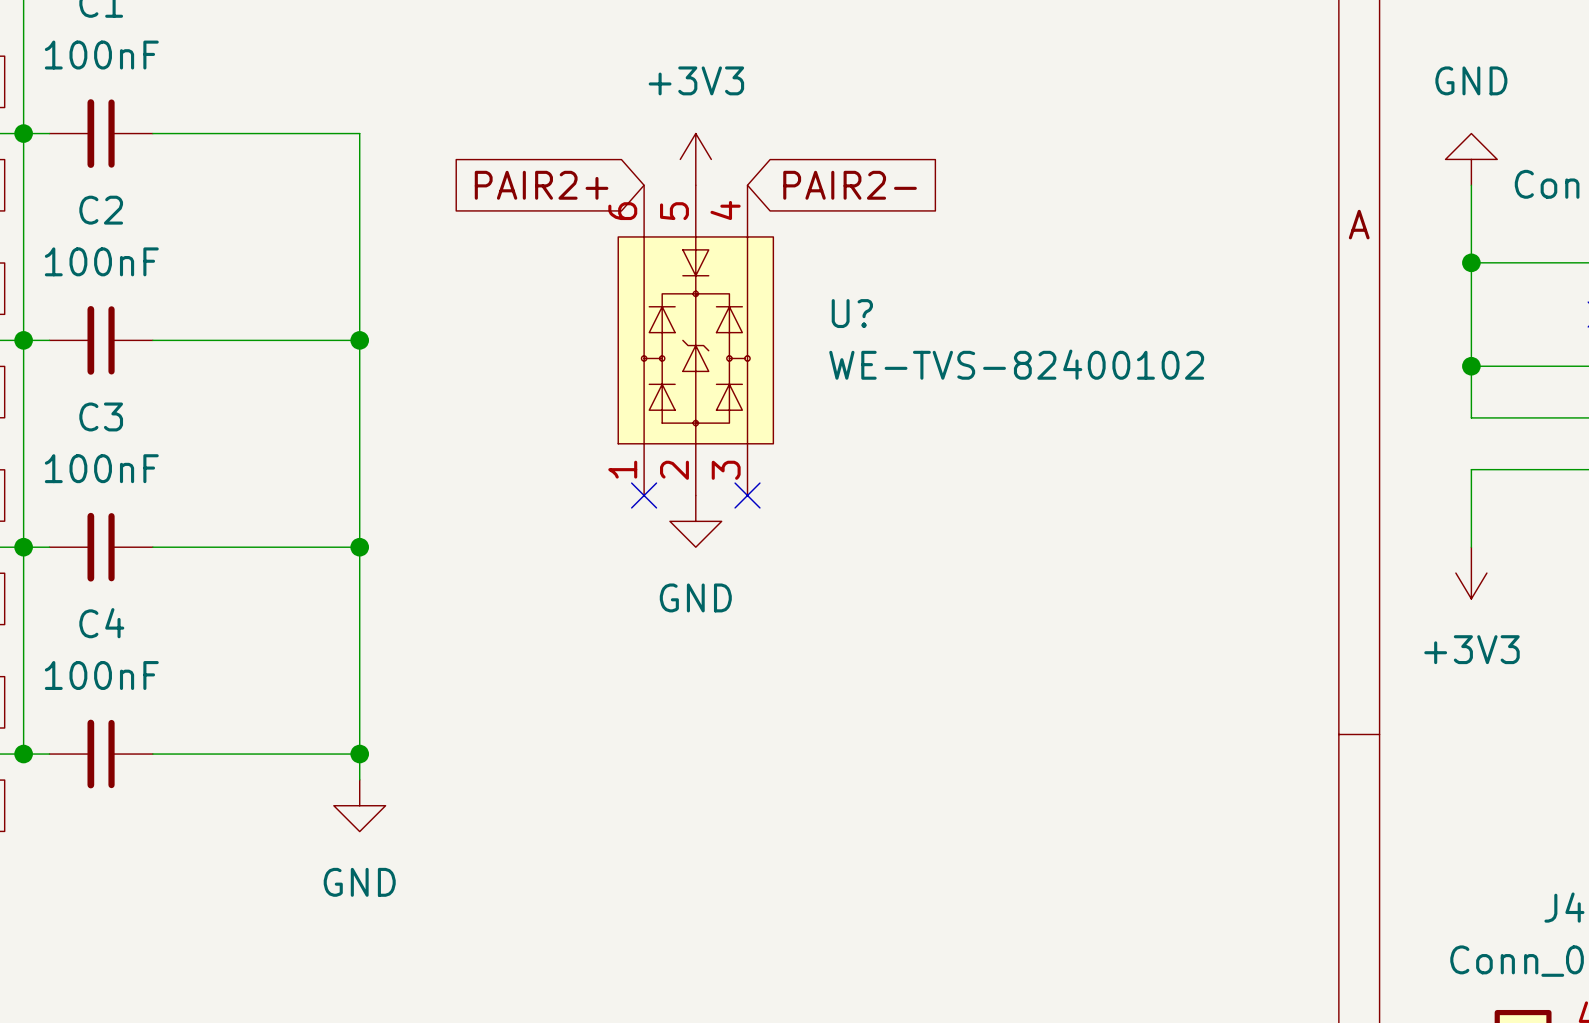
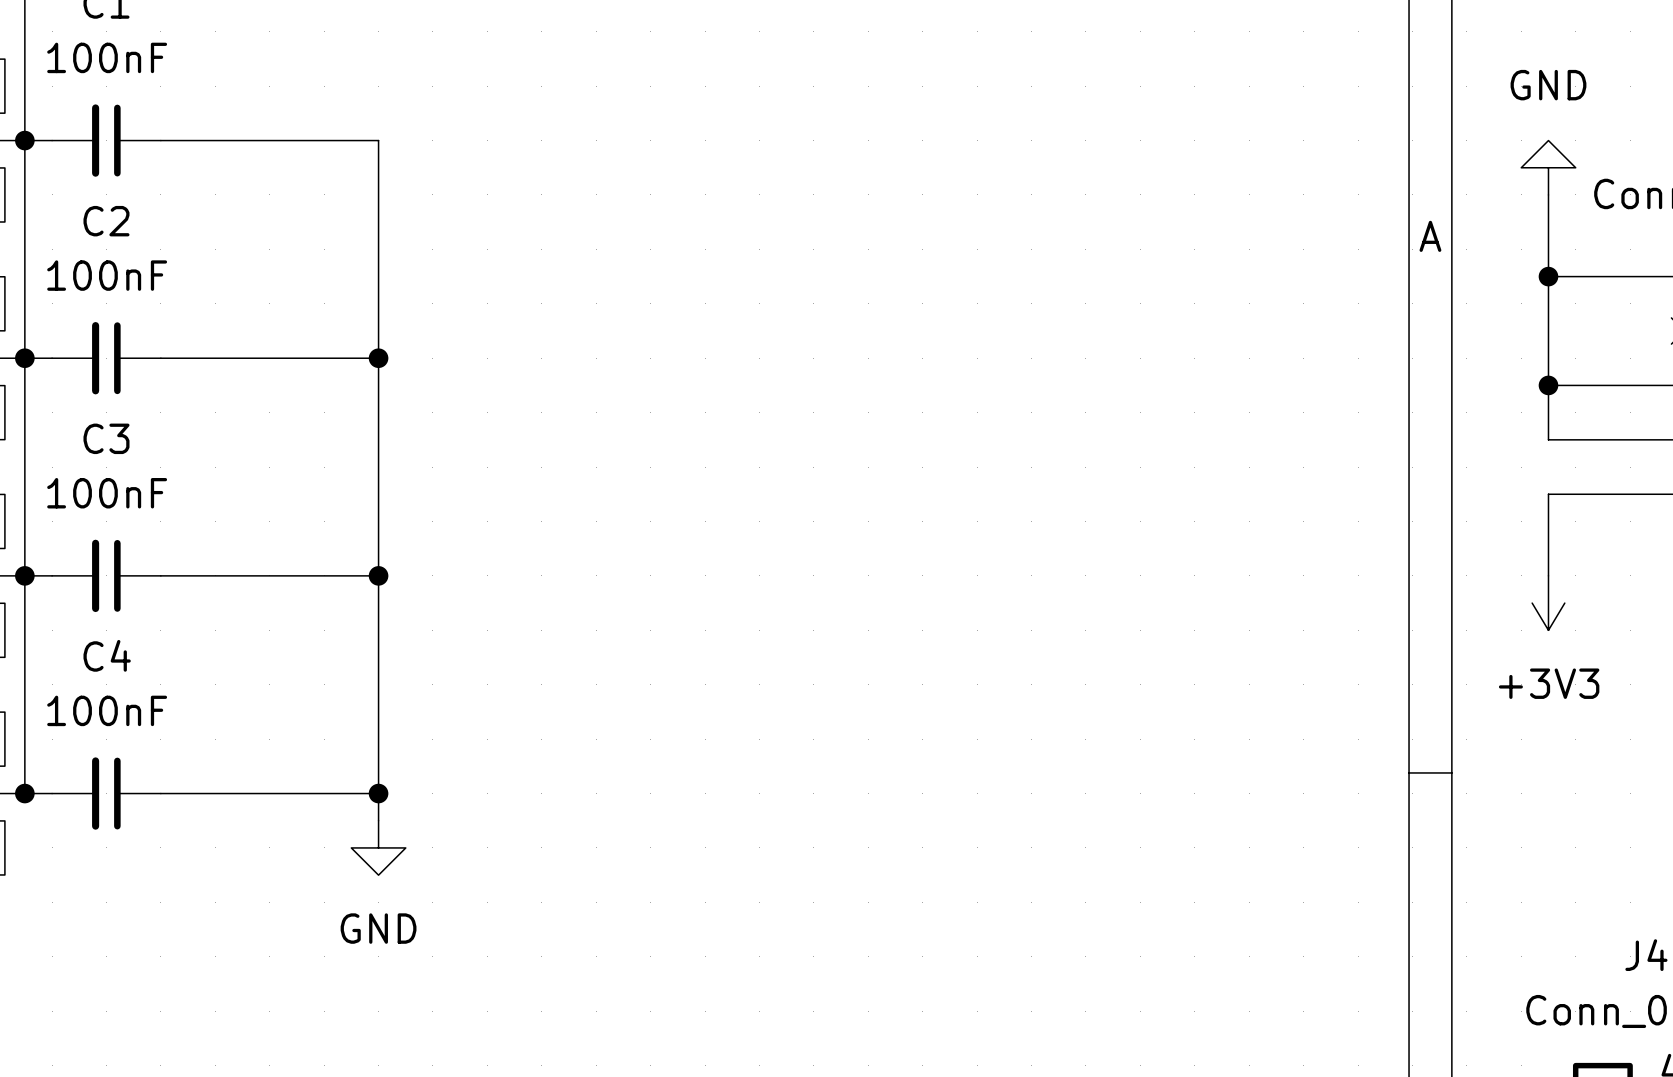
power symbol: +3V3 (695, 159) -> none
global label: PAIR2+ (541, 185) -> none
global label: PAIR2- (850, 185) -> none
U?: WE-TVS-82400102 (695, 340) -> none
no-connect mark: (644, 495) -> none
no-connect mark: (747, 495) -> none
power symbol: GND (695, 521) -> none

